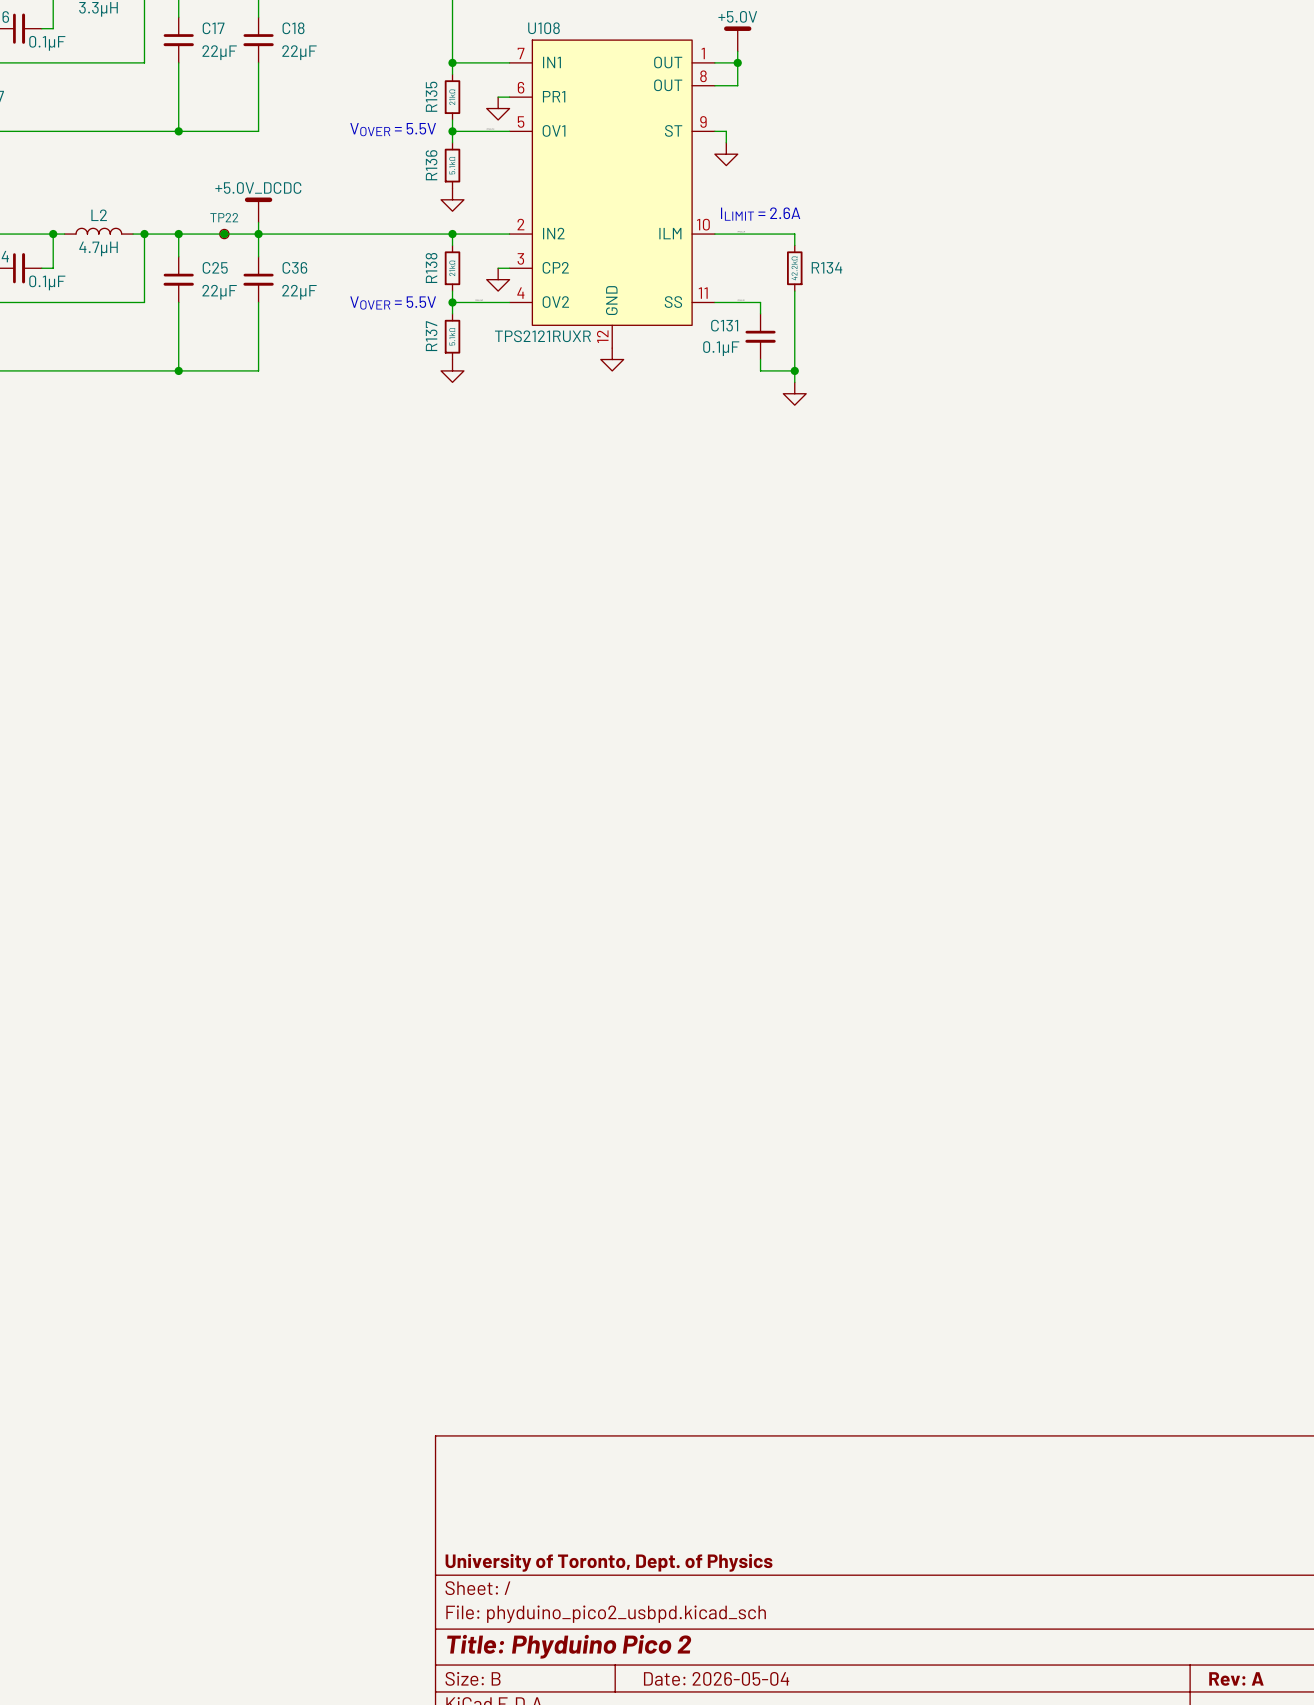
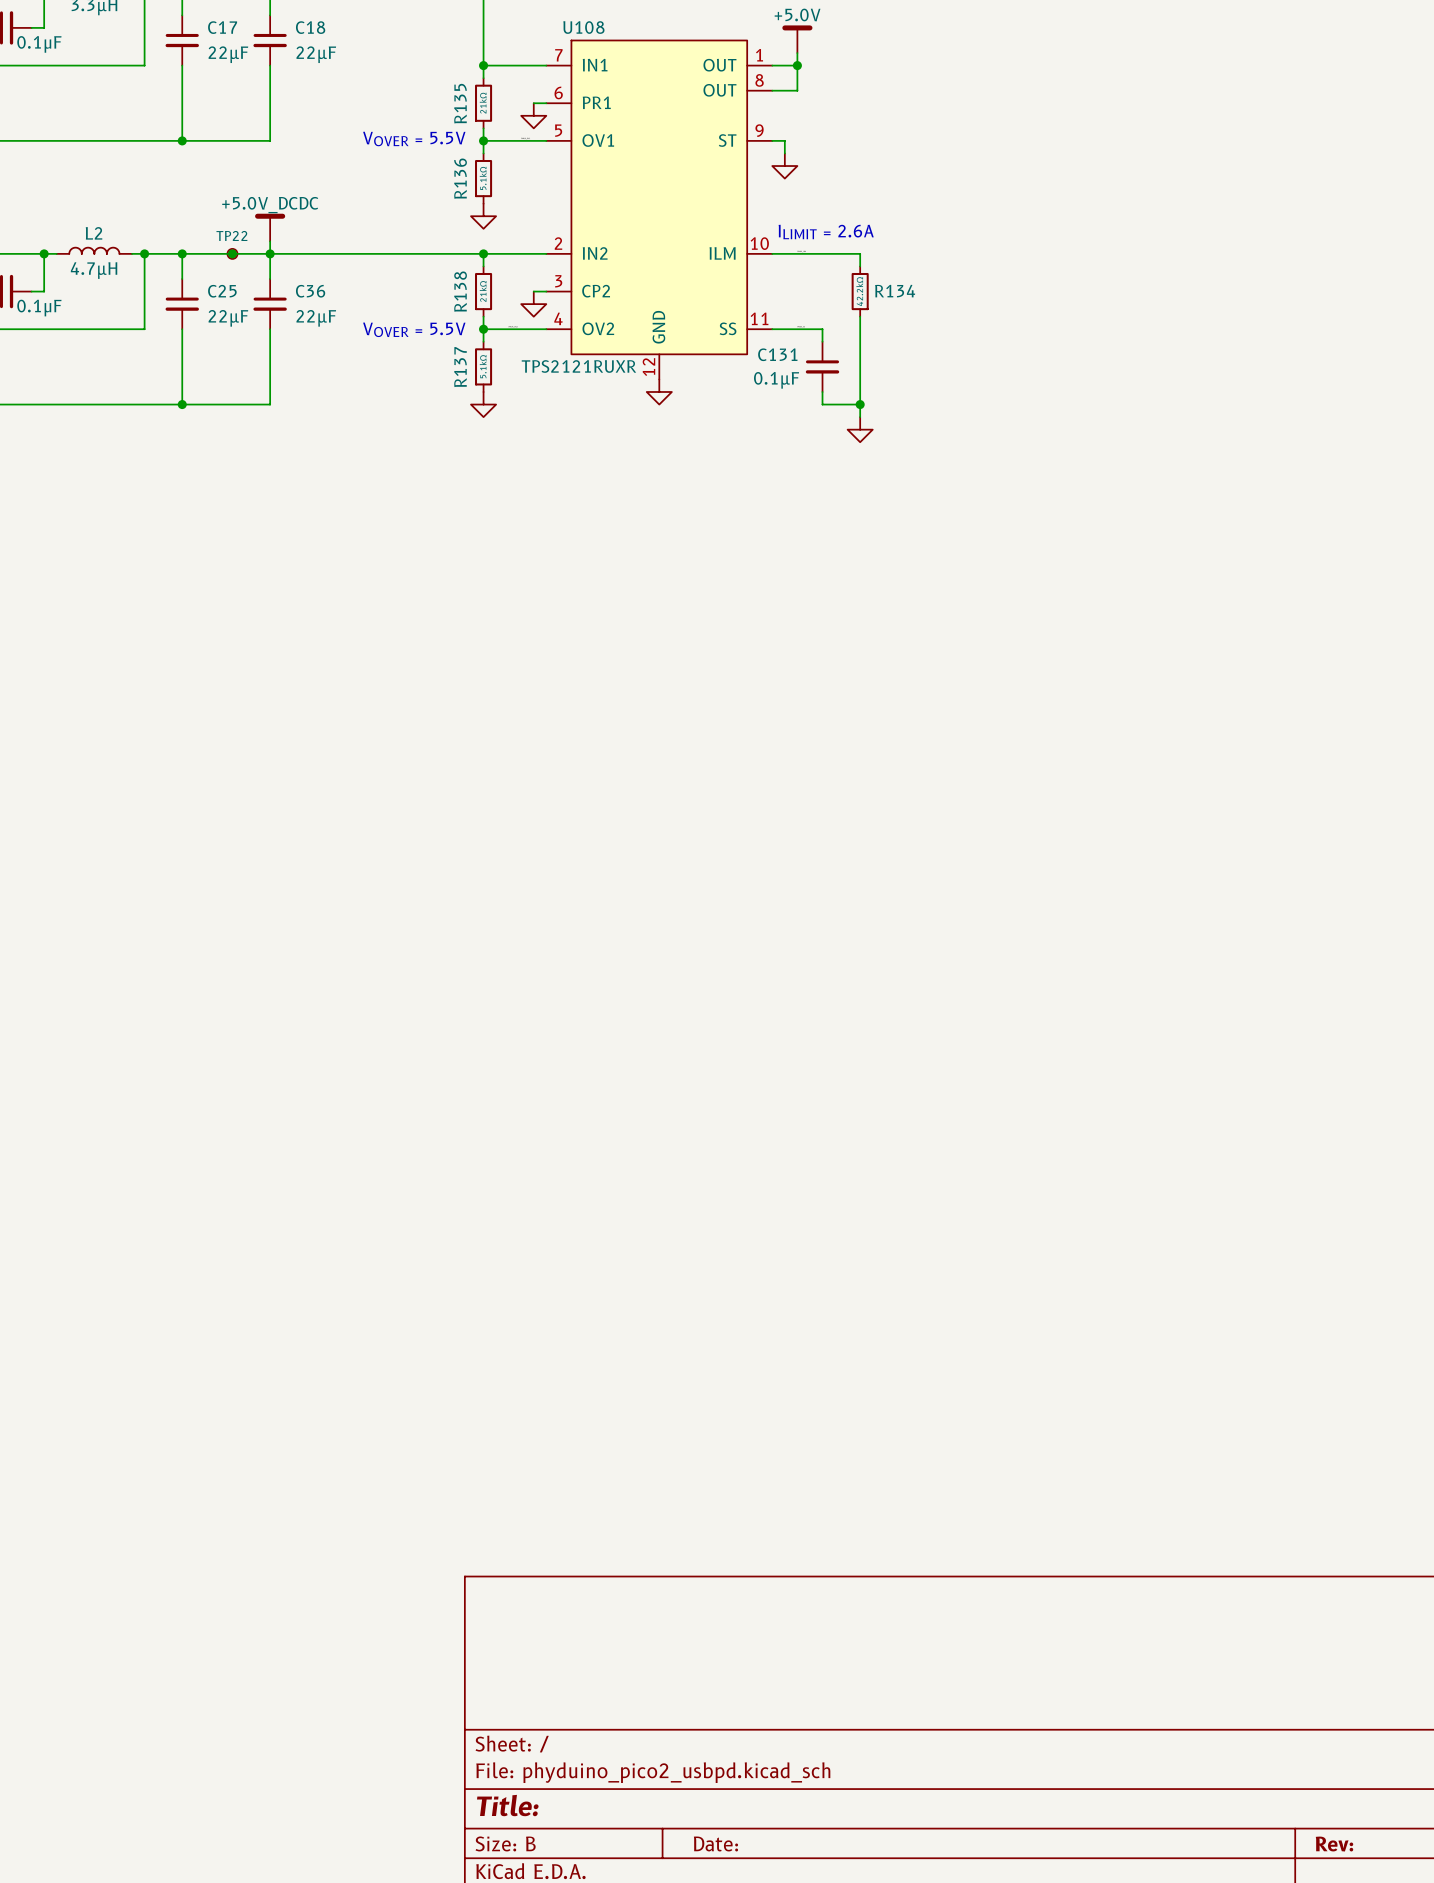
title block: University of Toronto, Dept. of Physics (609, 1562) -> none
title block: Title: Phyduino Pico 2 (569, 1646) -> Title: (507, 1805)
title block: Date: 2026-05-04 (716, 1678) -> Date: (715, 1843)
title block: Rev: A (1236, 1678) -> Rev: (1334, 1844)

